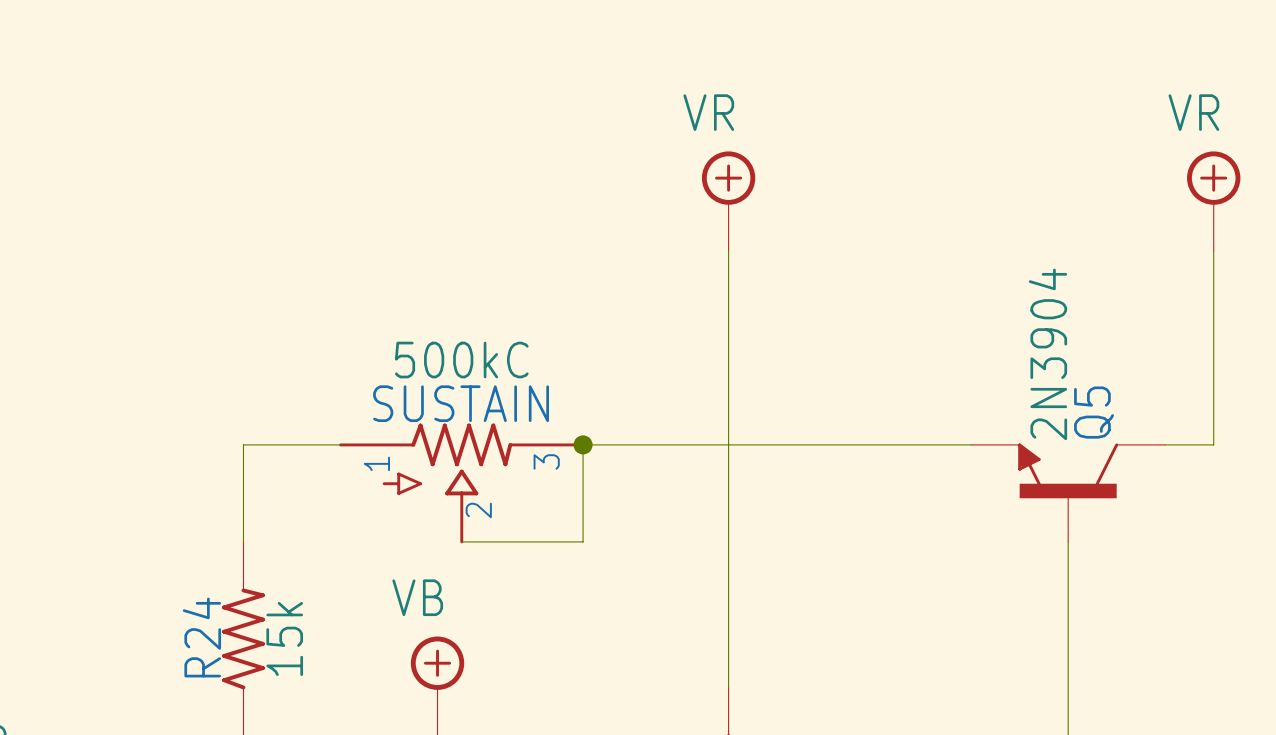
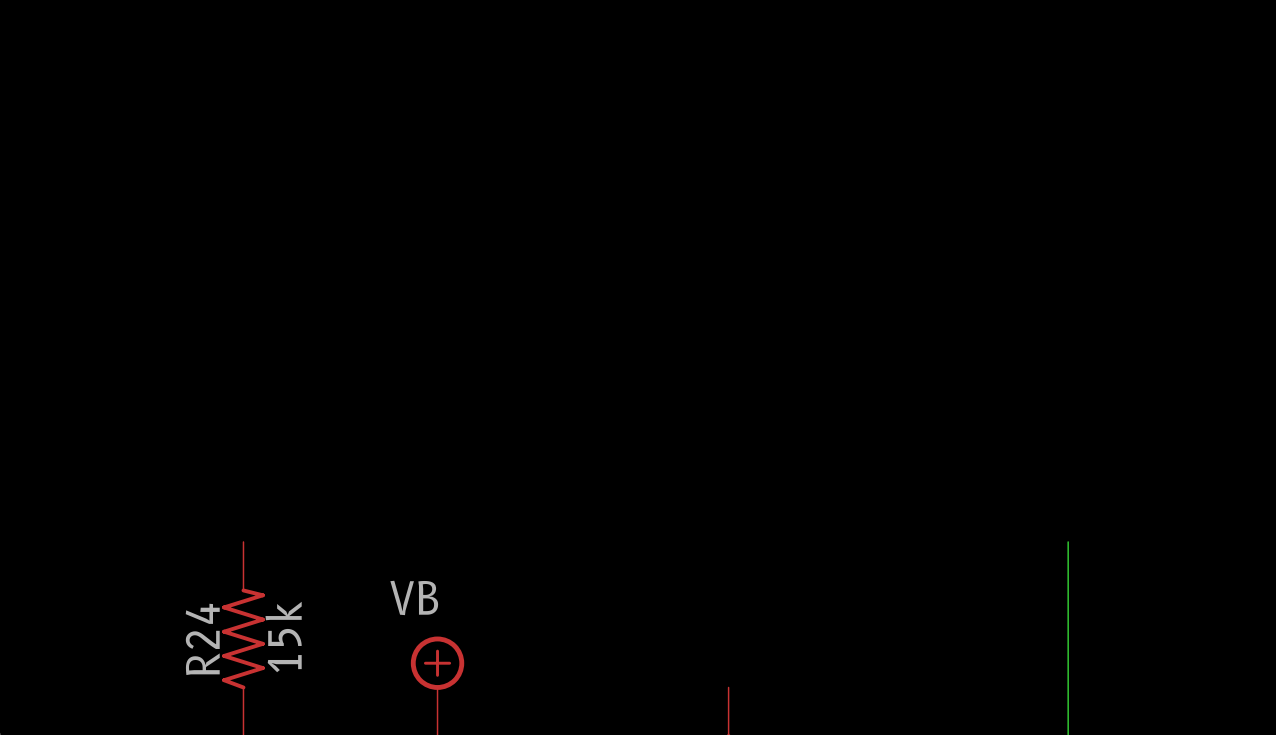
power symbol: VR (728, 201) -> none
power symbol: VR (1213, 201) -> none
wire: (728, 250) (728, 687) -> none
wire: (1213, 250) (1213, 444) (1165, 444) -> none
wire: (340, 444) (243, 444) (243, 541) -> none
junction: (583, 444) -> none
wire: (971, 444) (583, 444) (583, 541) (461, 541) -> none
SUSTAIN: 500kC (461, 483) -> none
Q5: 2N3904 (1068, 492) -> none

